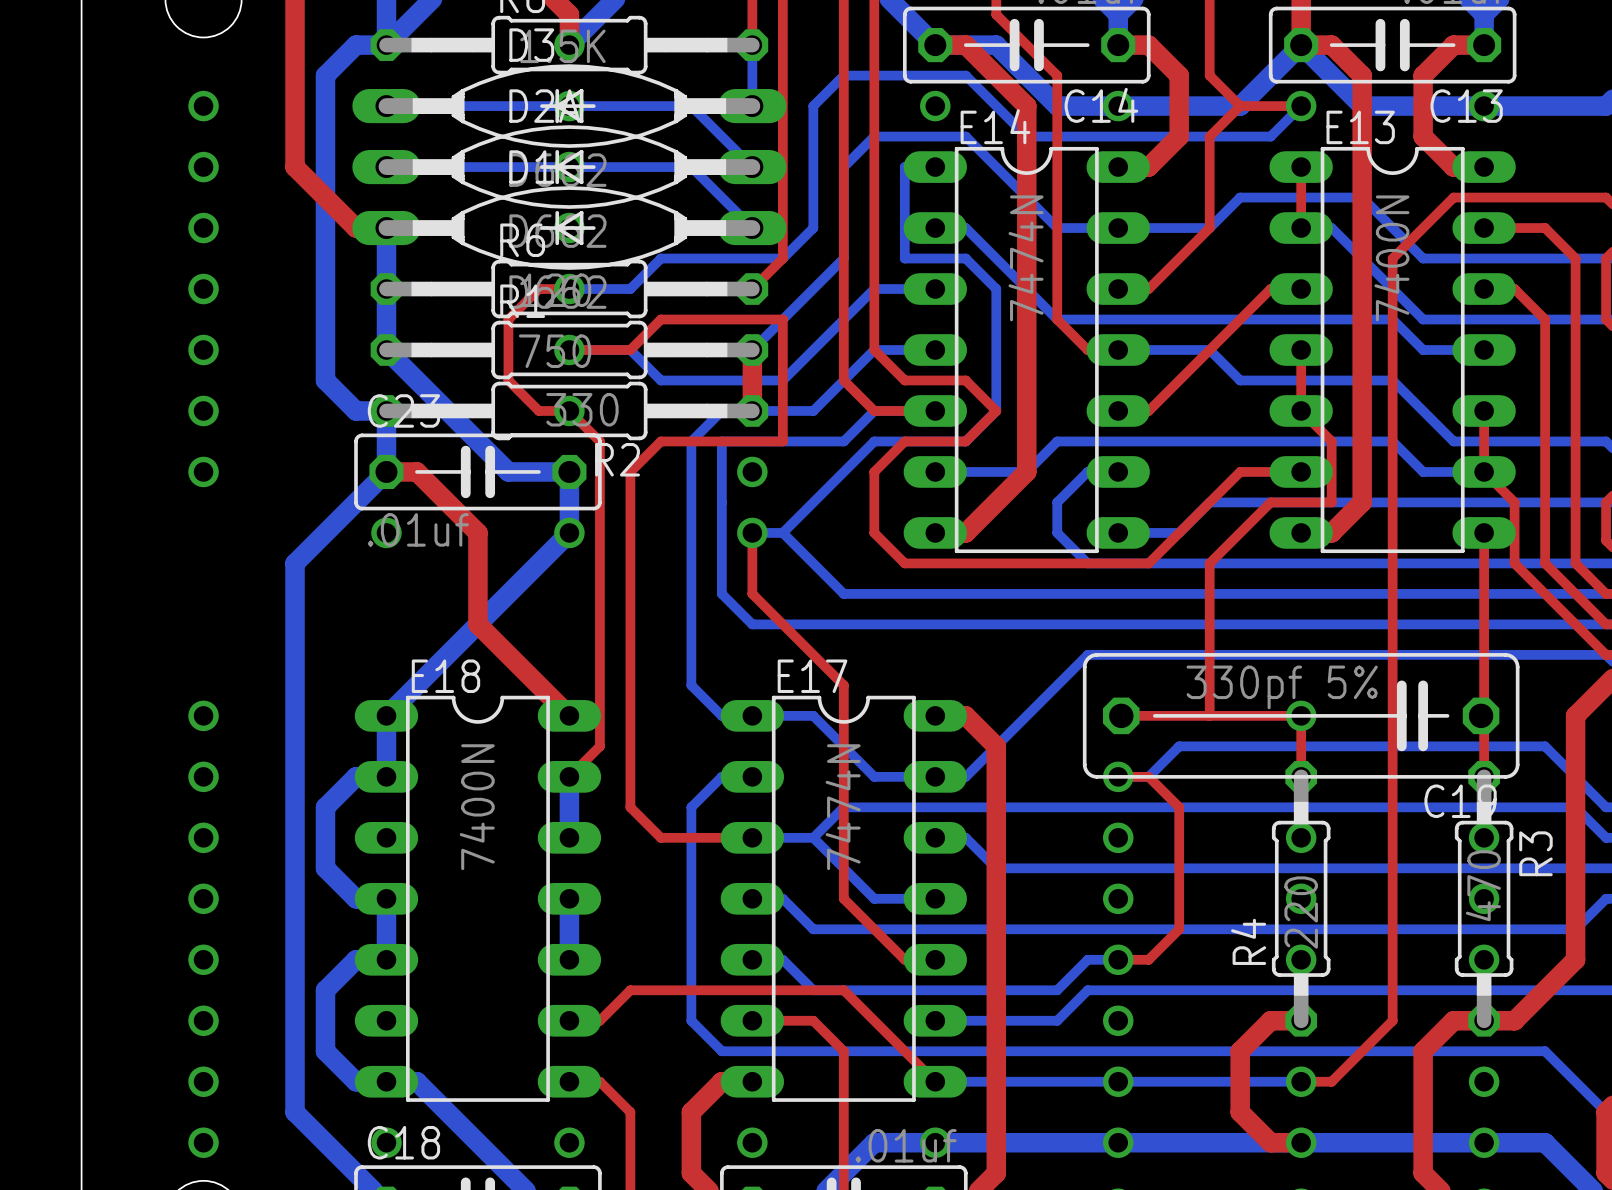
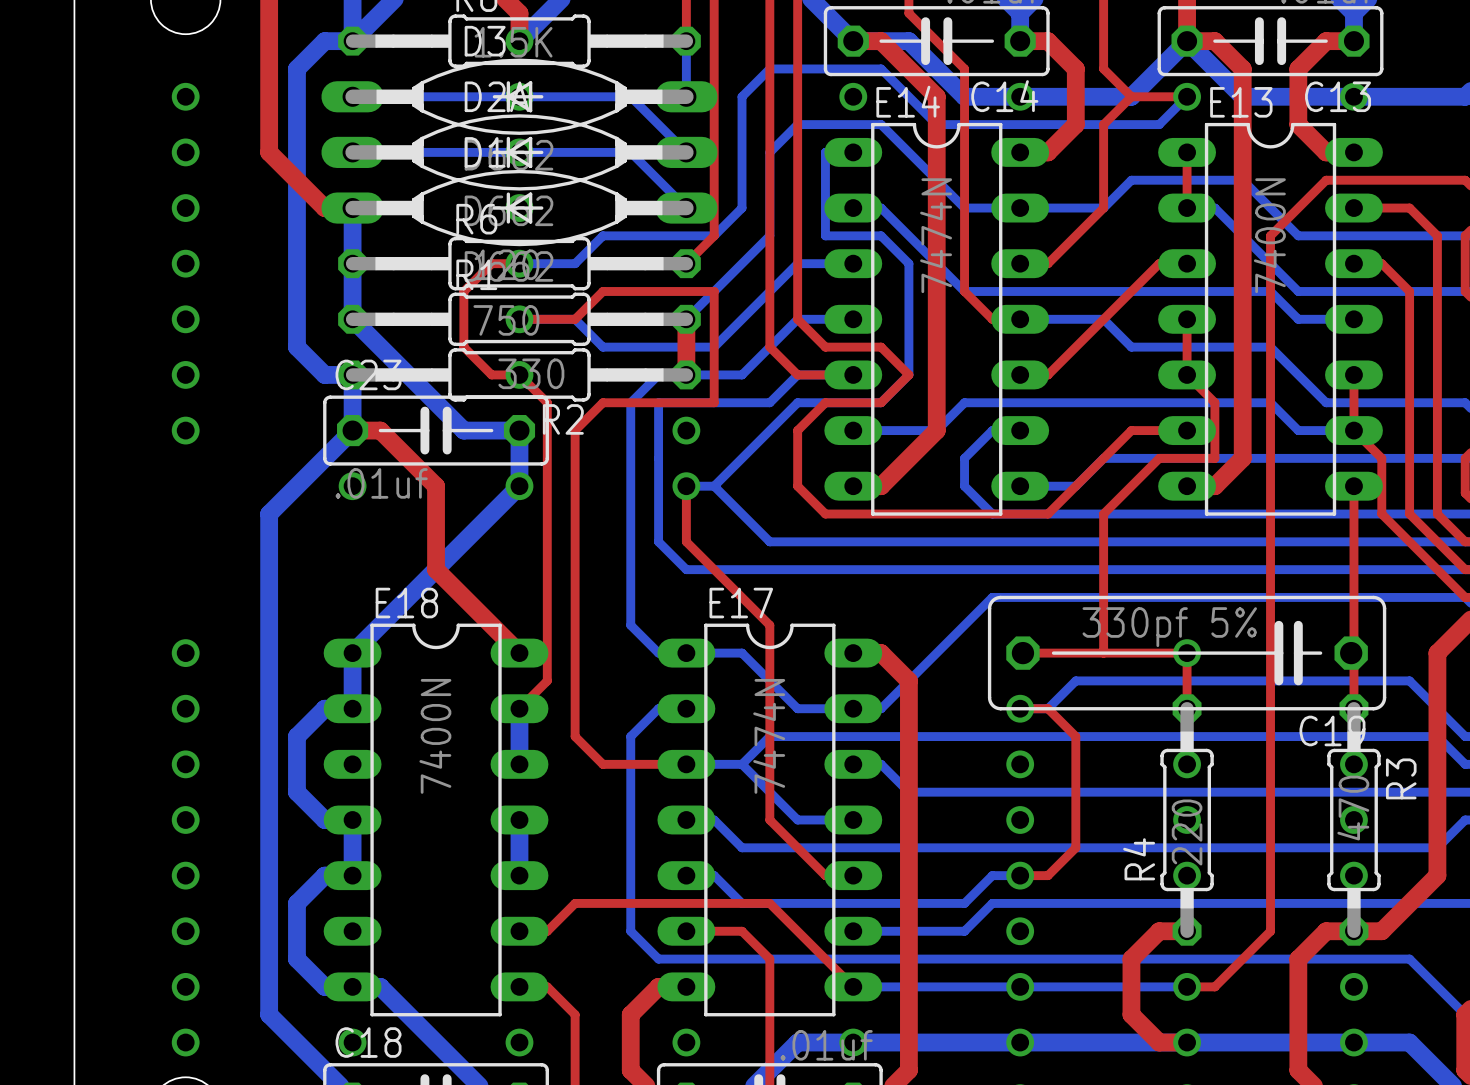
E14 name position: E14 (995, 126) -> E14 (908, 101)
E13 name position: E13 (1360, 127) -> E13 (1241, 102)
E14 footprint: [903, 146, 1150, 554] -> [824, 122, 1050, 516]
E13 footprint: [1269, 146, 1516, 554] -> [1158, 122, 1383, 516]
E18 name position: E18 (445, 676) -> E18 (406, 603)
E17 name position: E17 (812, 676) -> E17 (741, 603)
E18 footprint: [354, 695, 602, 1102] -> [323, 623, 549, 1017]
E17 footprint: [720, 695, 968, 1102] -> [657, 623, 883, 1017]

